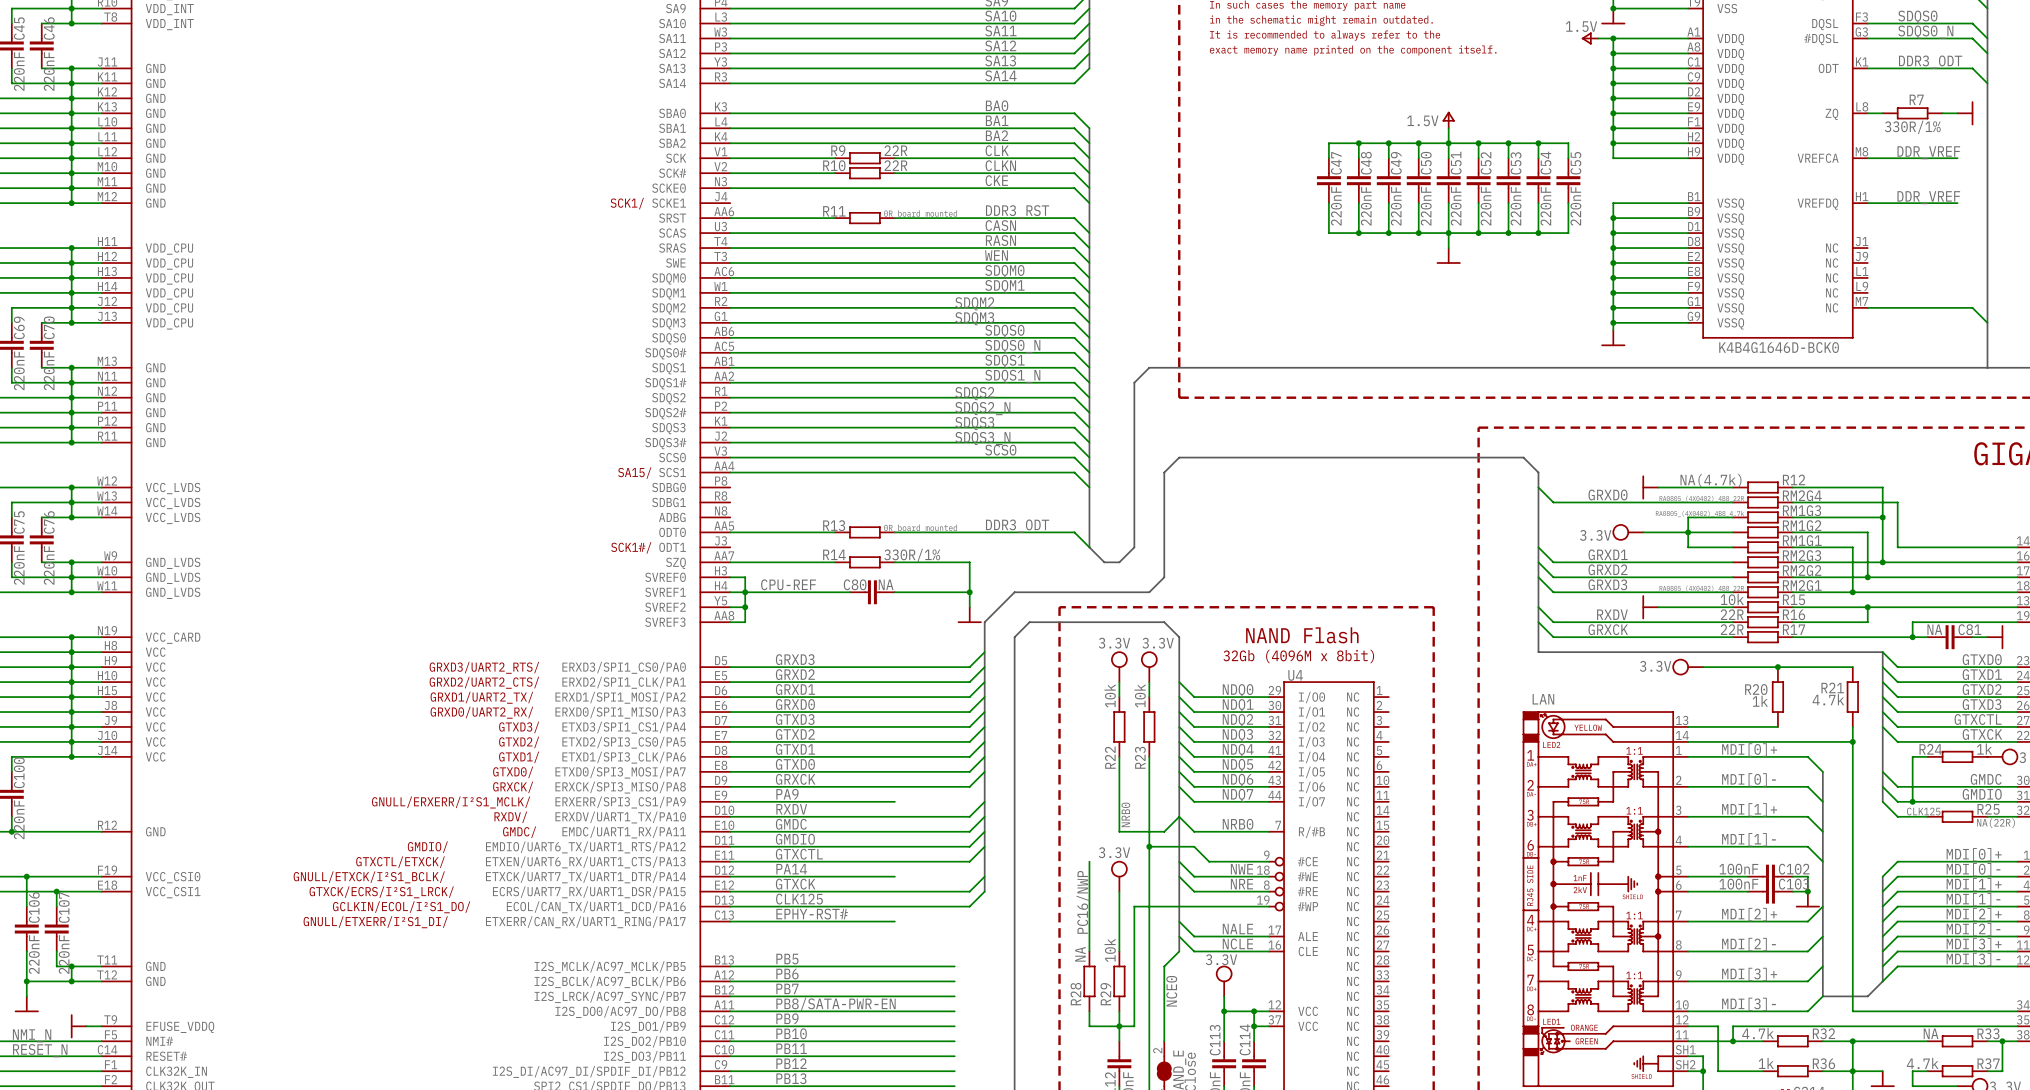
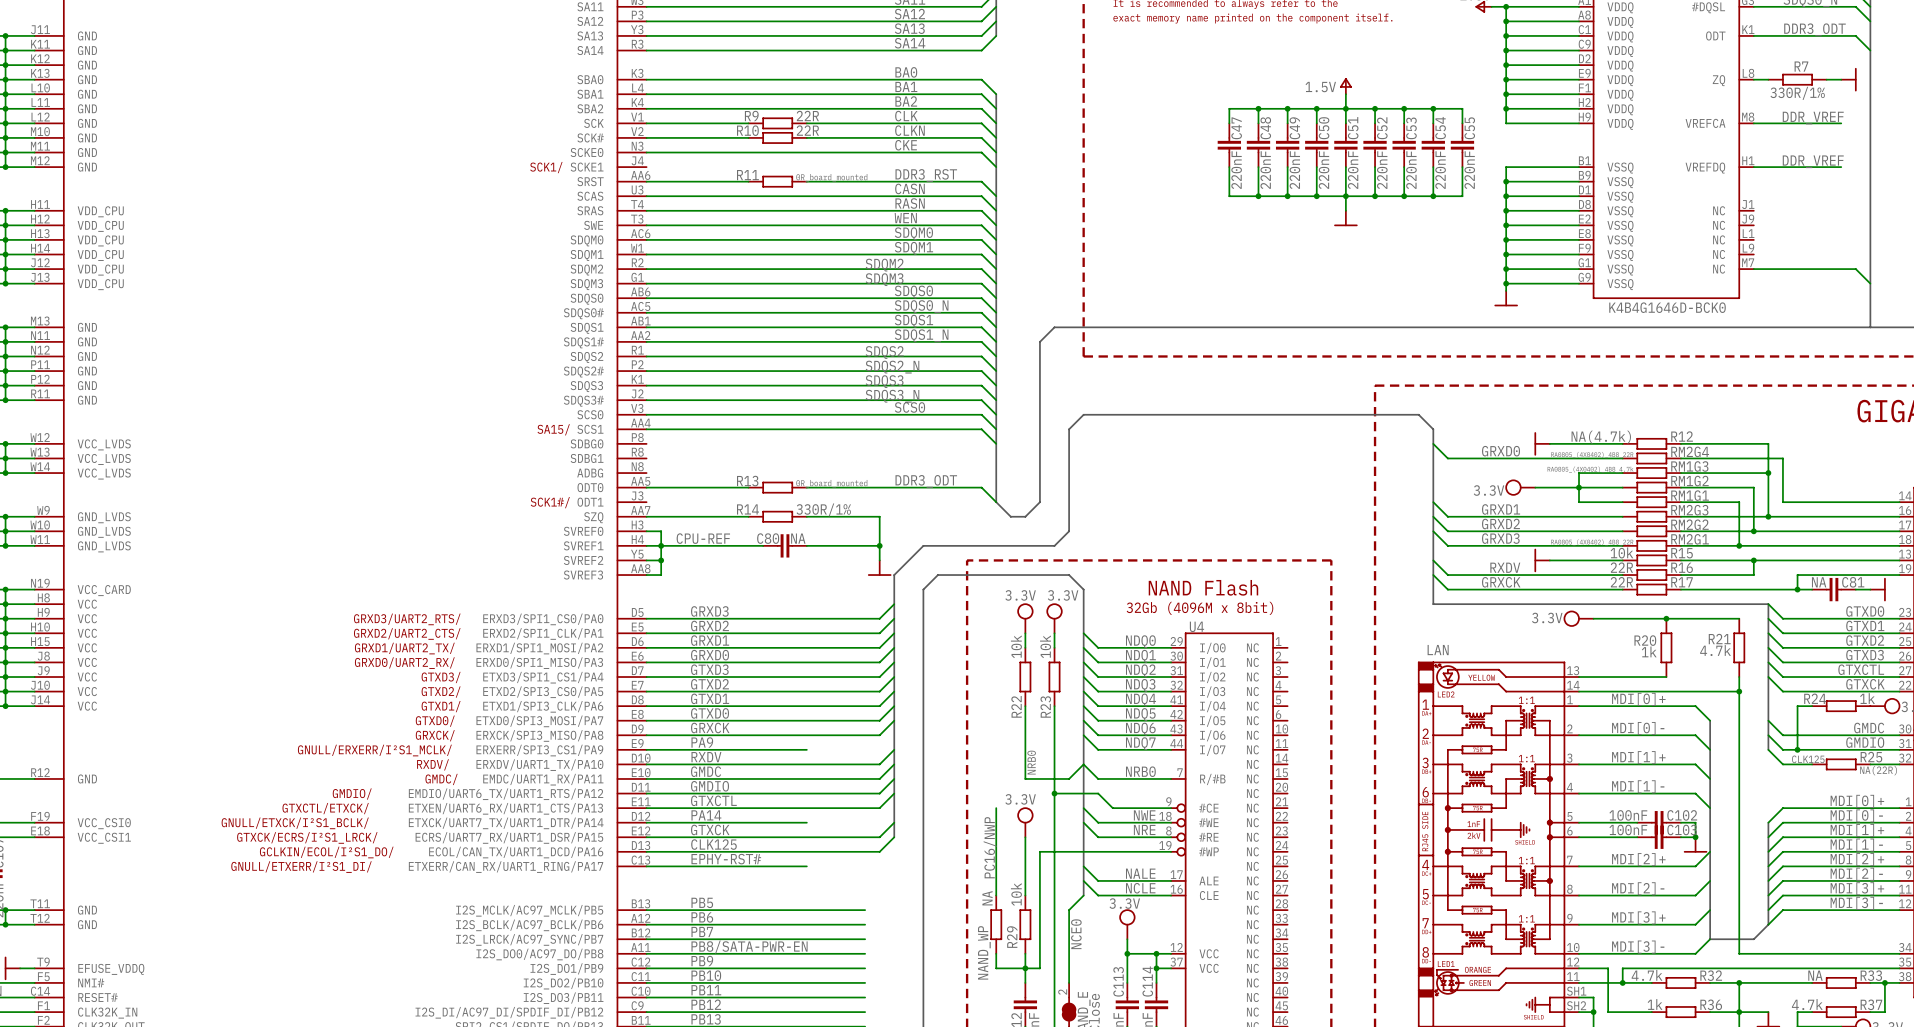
R28 name: R28 (1075, 994) -> NAND_WP (984, 952)

